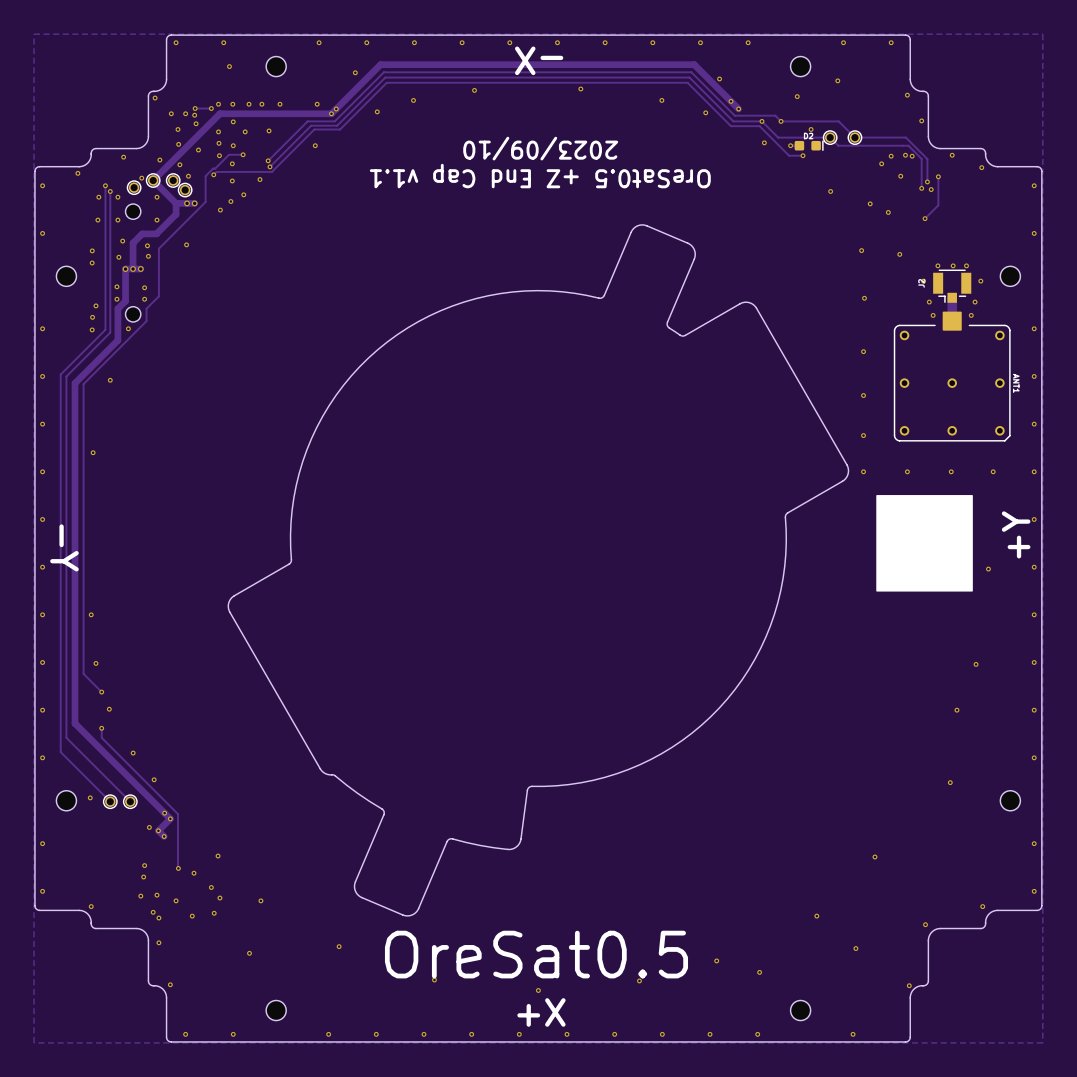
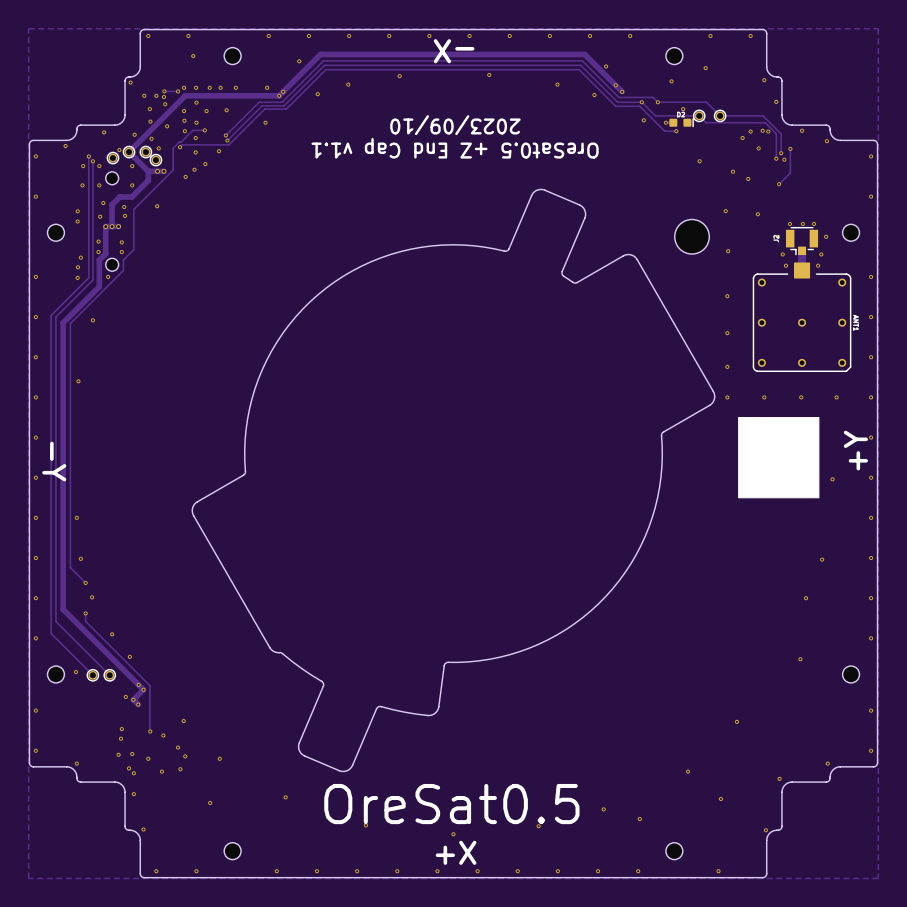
part: none -> (692, 236)

